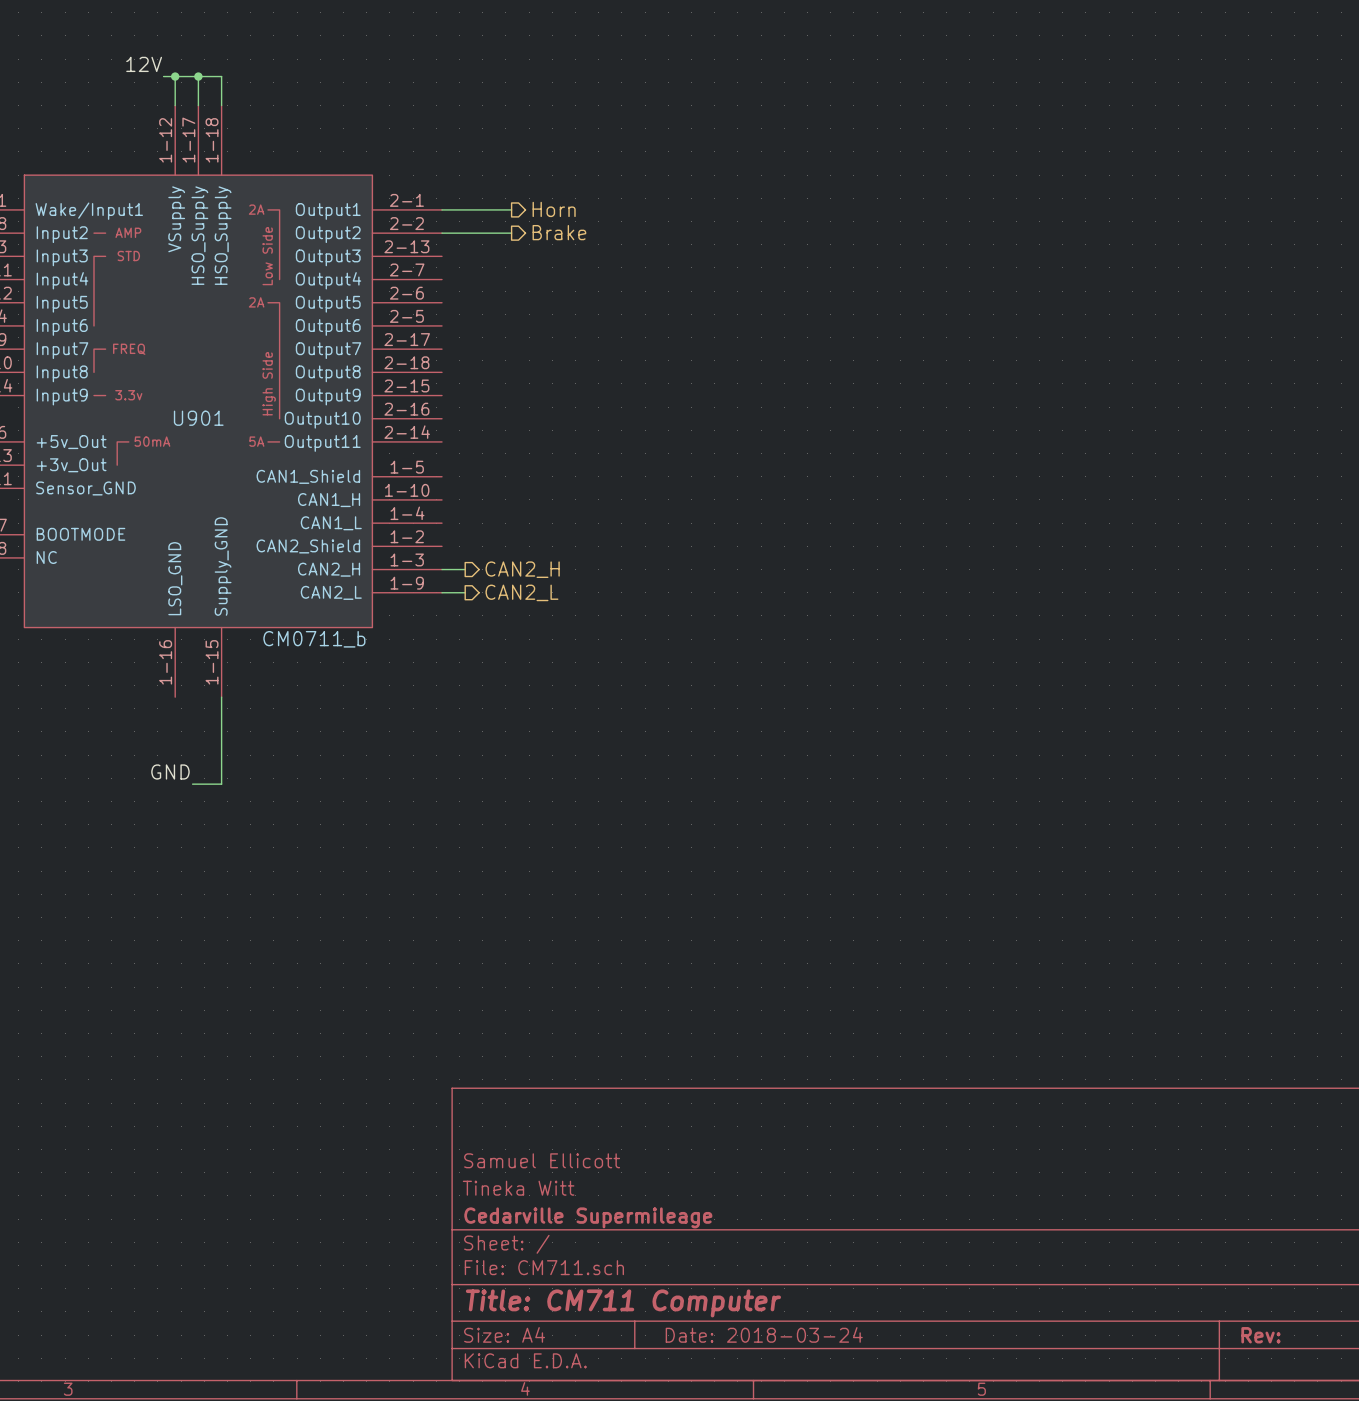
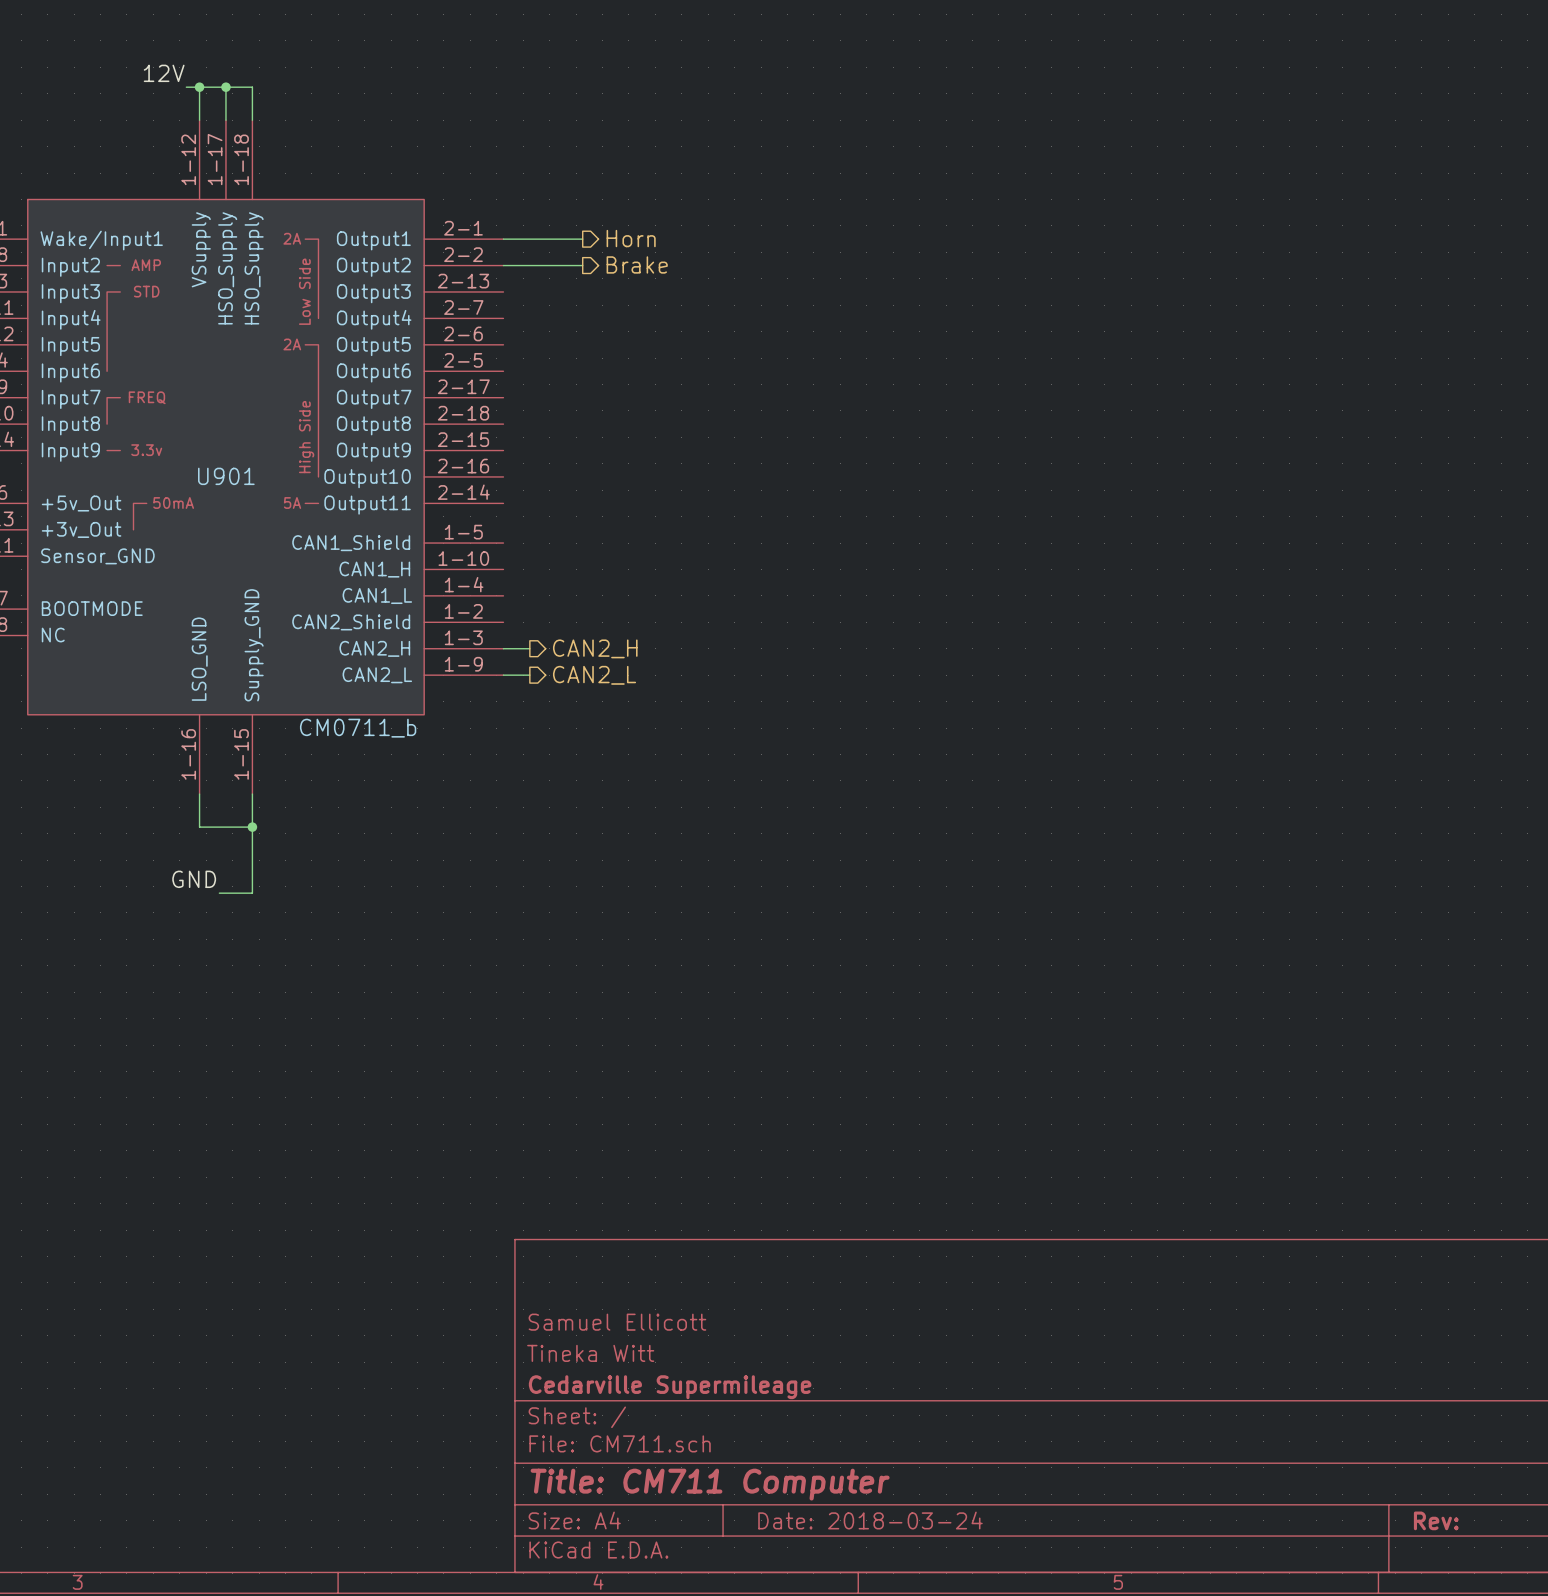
wire: none -> (199, 794) (199, 827) (252, 827)
junction: none -> (252, 827)

